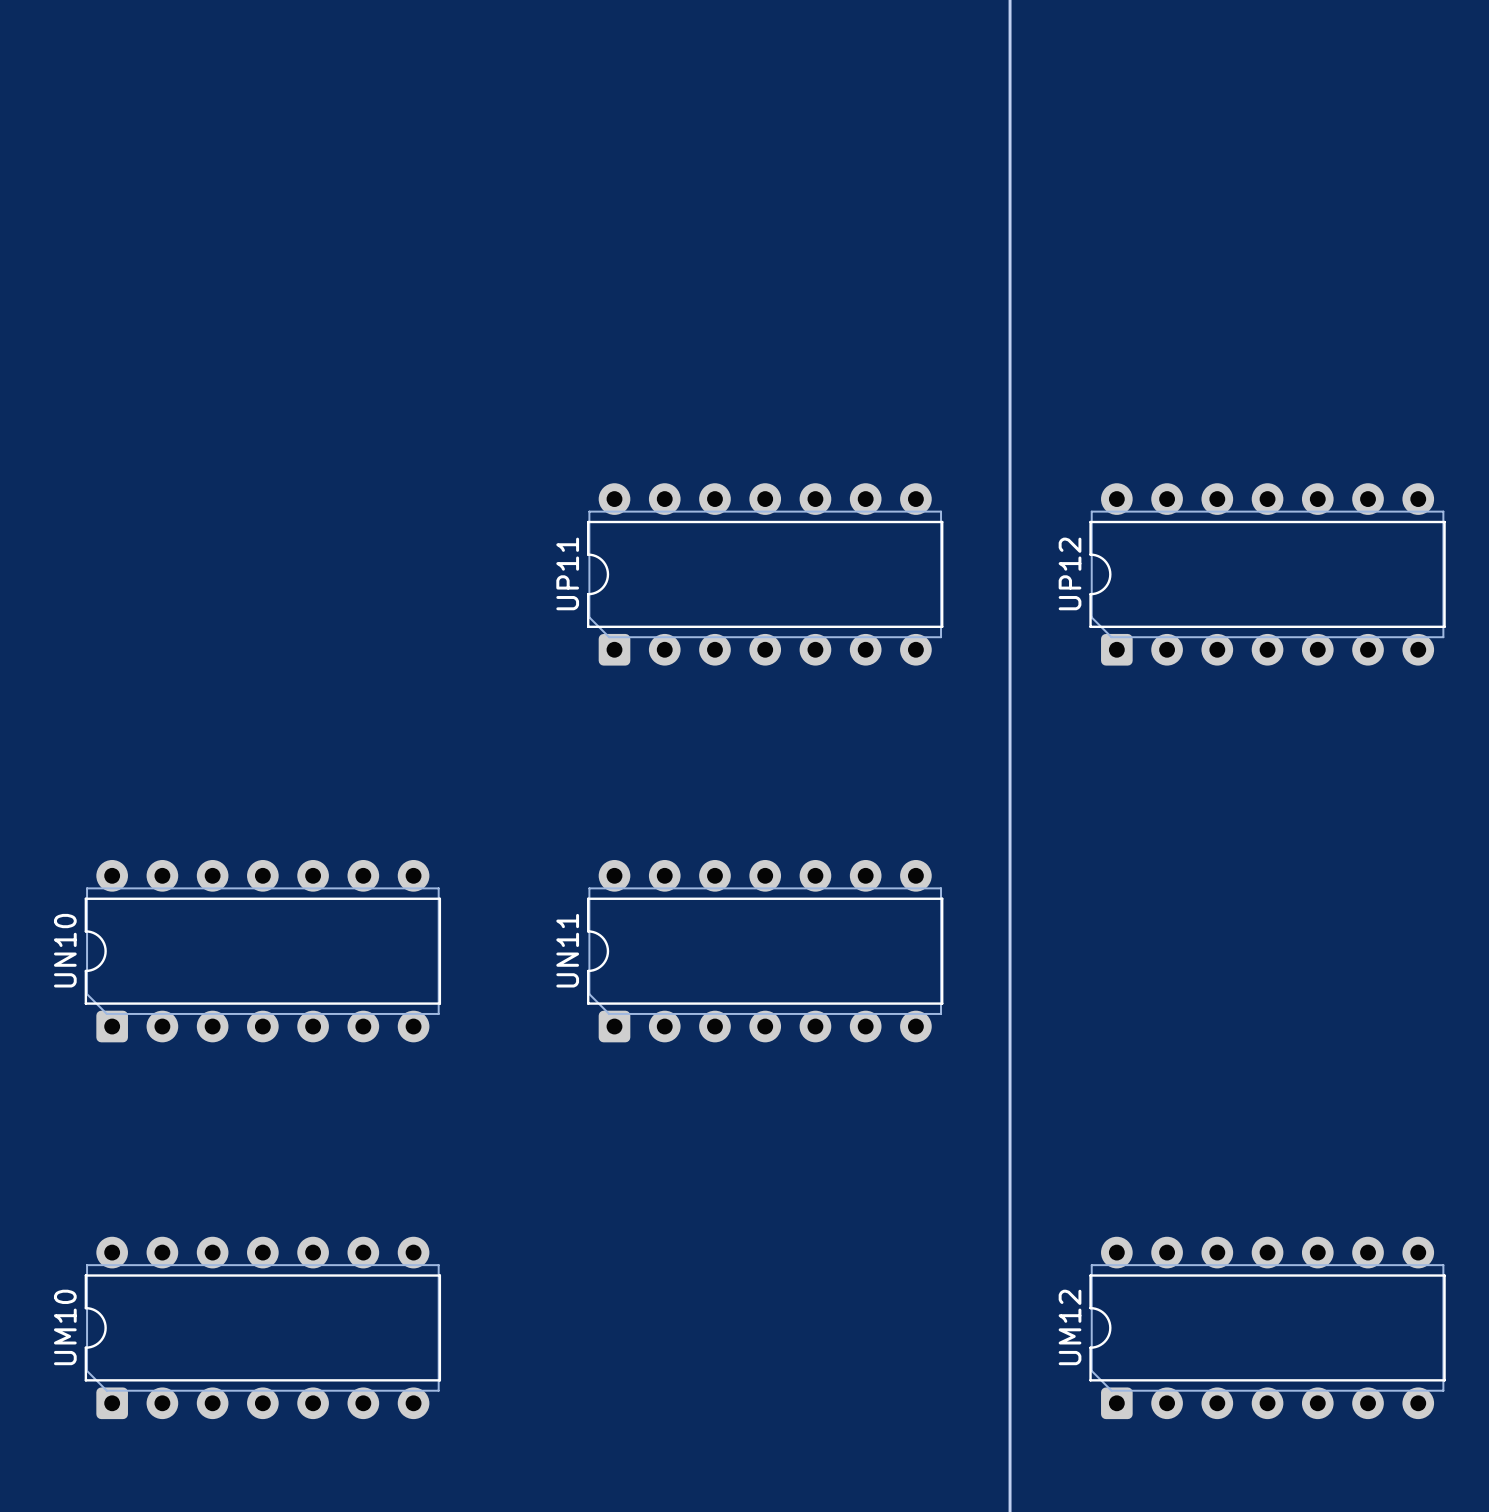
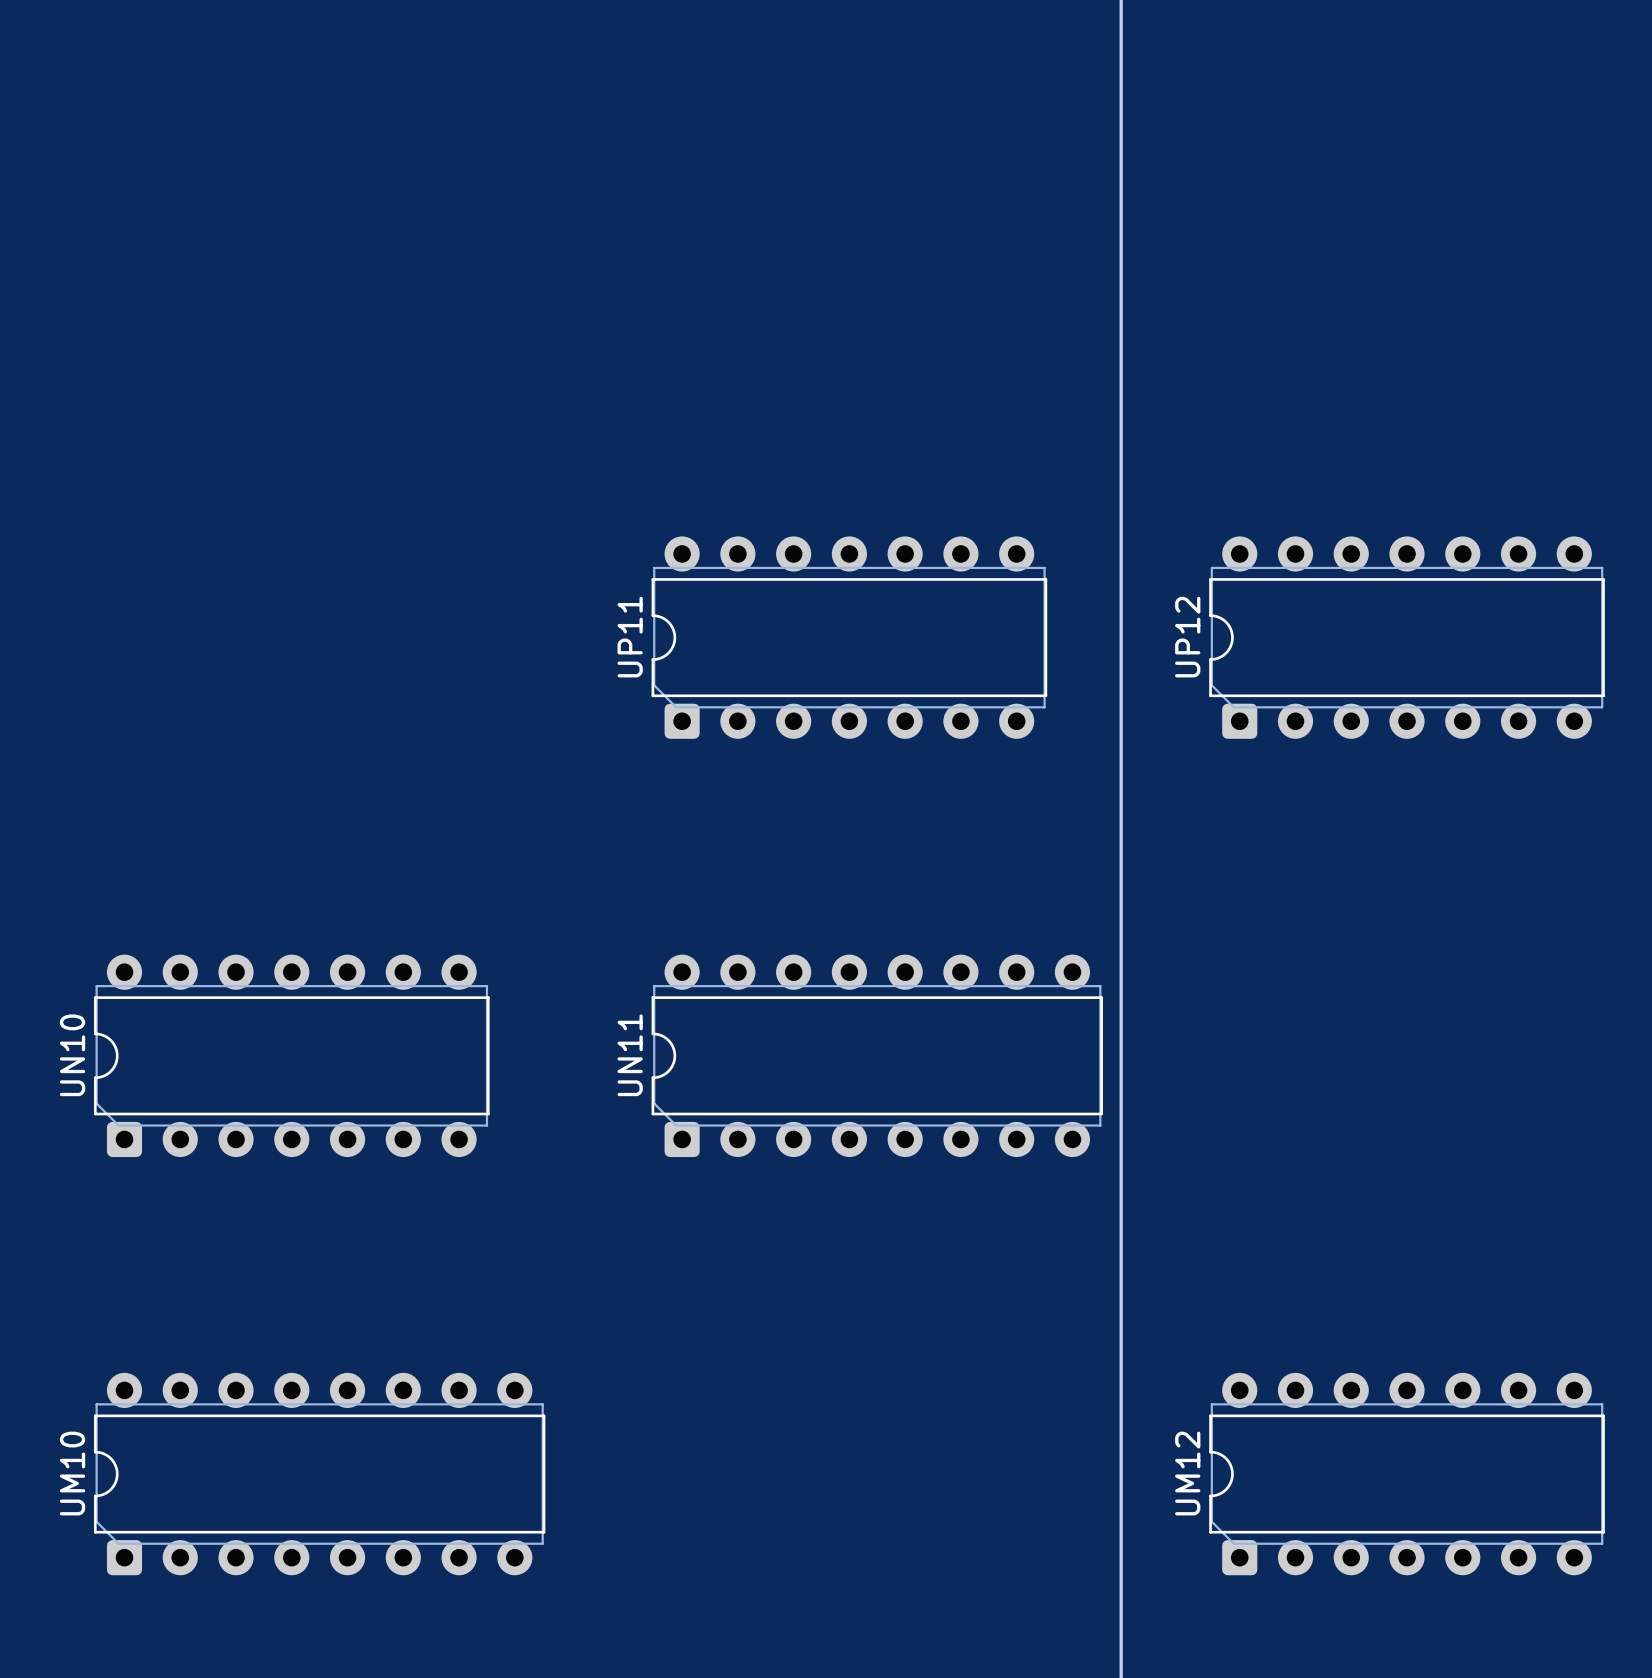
UN11 footprint: [587, 860, 944, 1043] -> [651, 954, 1103, 1158]
UM10 footprint: [84, 1236, 442, 1420] -> [93, 1372, 546, 1576]

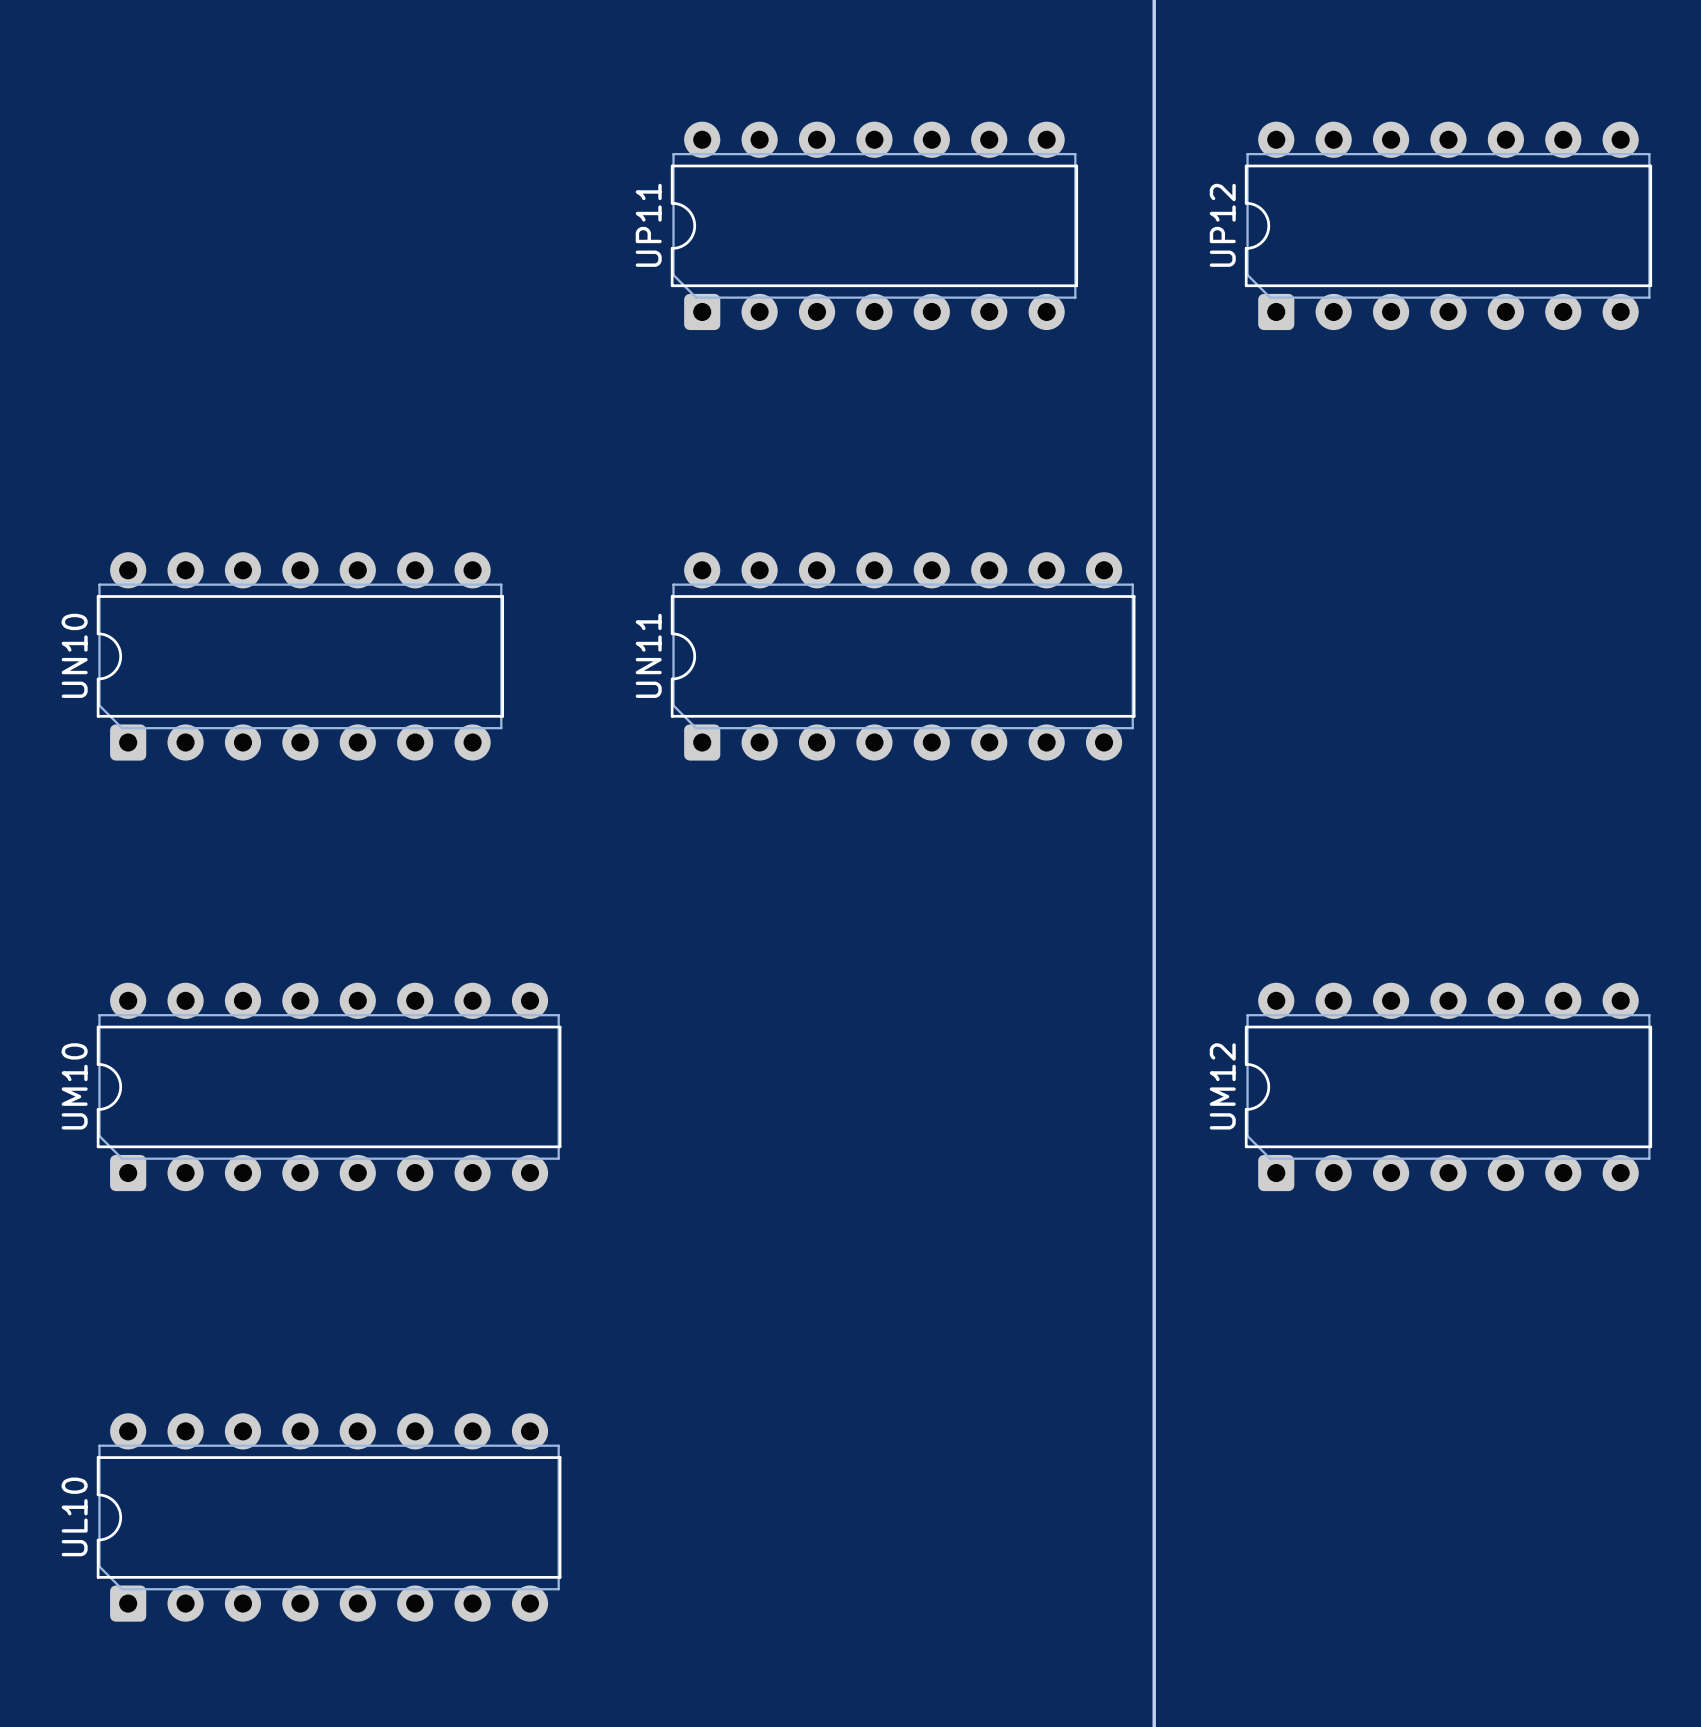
UP11 position: (849, 637) -> (874, 225)
UP12 position: (1407, 637) -> (1448, 225)
UN10 position: (291, 1055) -> (300, 656)
UM10: none -> (329, 1086)
UN11 position: (877, 1055) -> (903, 656)
UM10 name: UM10 (72, 1473) -> UL10 (74, 1516)
UM12 position: (1407, 1474) -> (1448, 1086)

